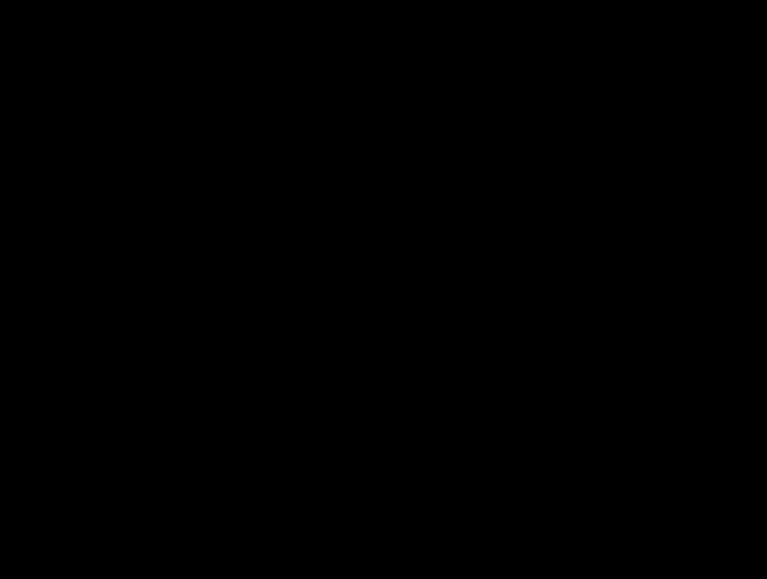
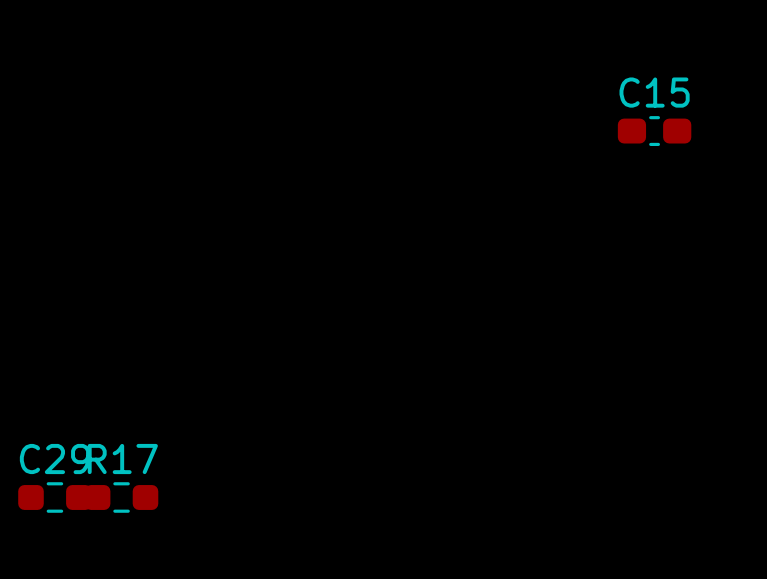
C15: none -> (654, 131)
C29: none -> (54, 497)
R17: none -> (121, 497)

